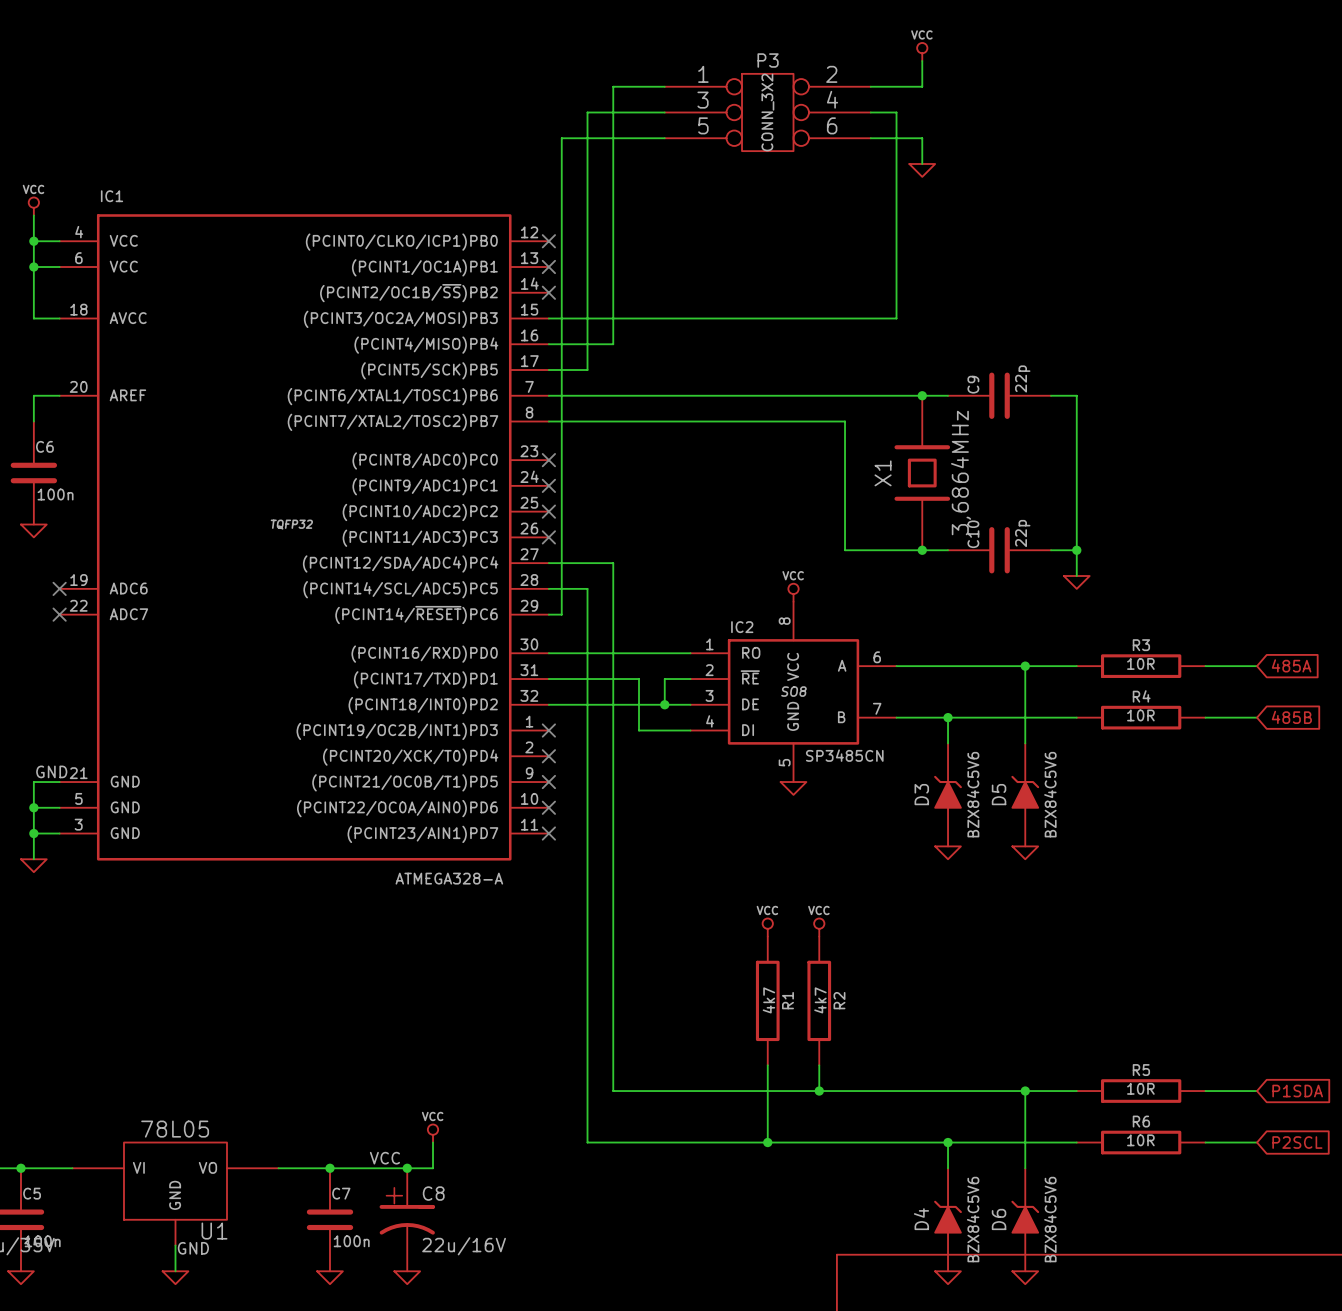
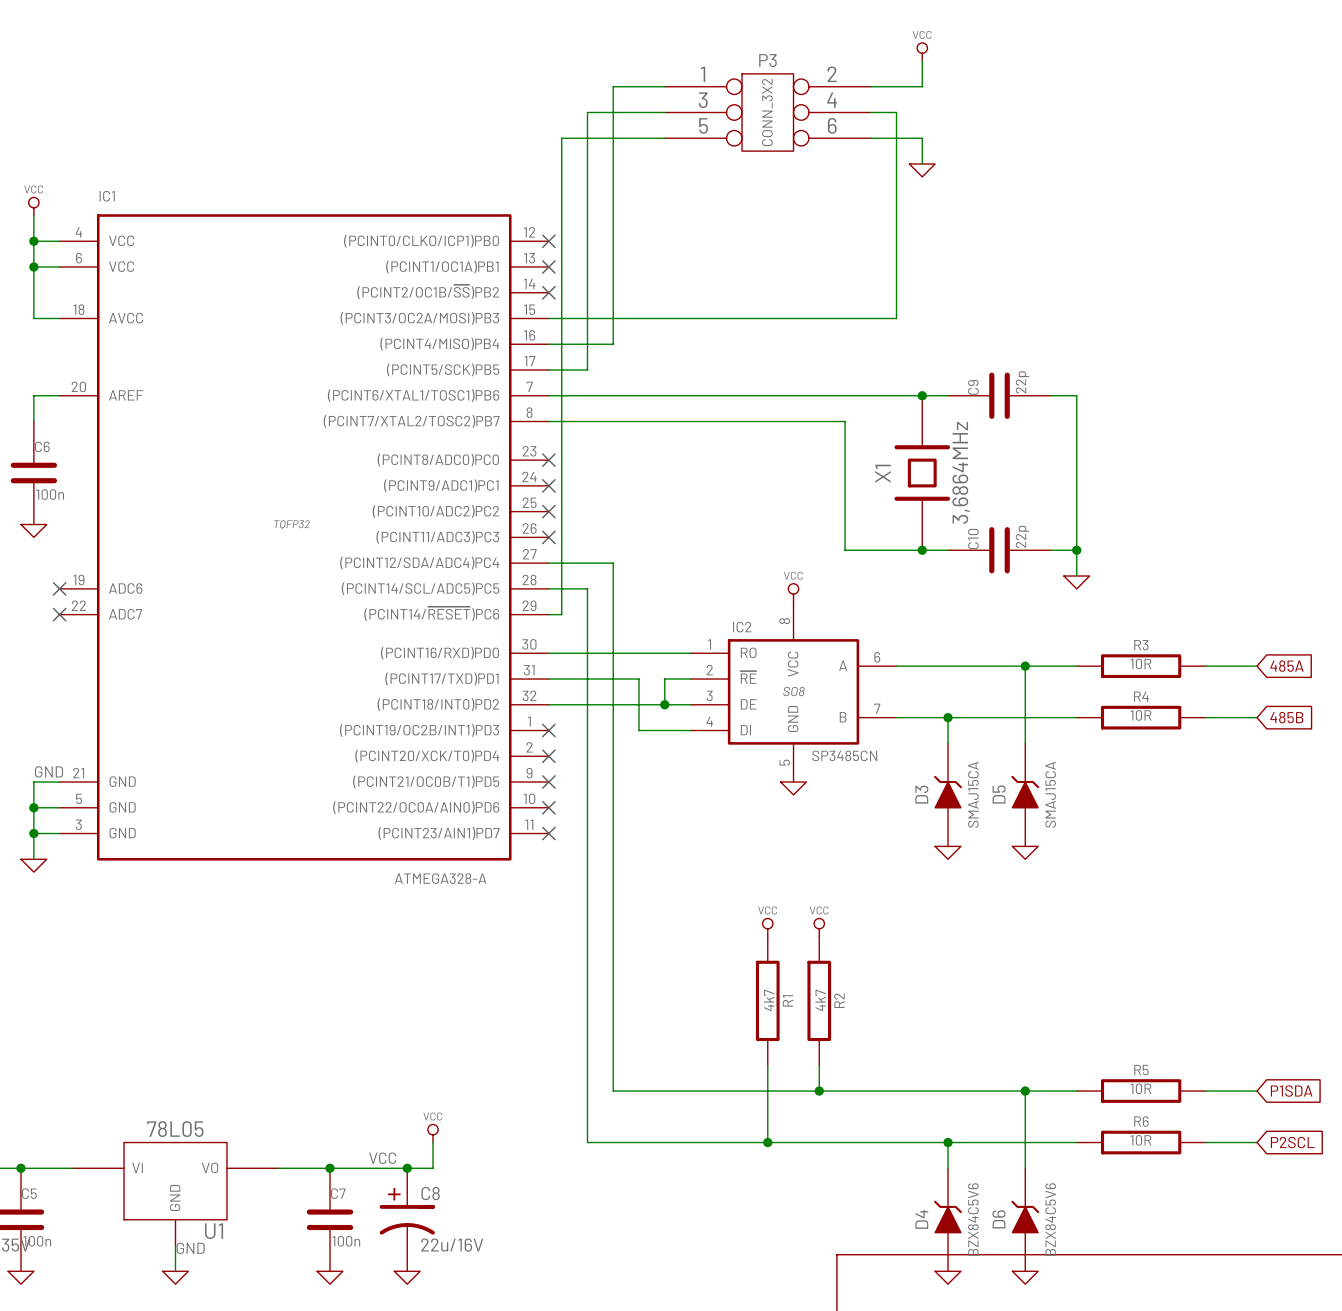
D3 value: BZX84C5V6 (973, 794) -> SMAJ15CA (973, 794)
D5 value: BZX84C5V6 (1050, 794) -> SMAJ15CA (1050, 794)

